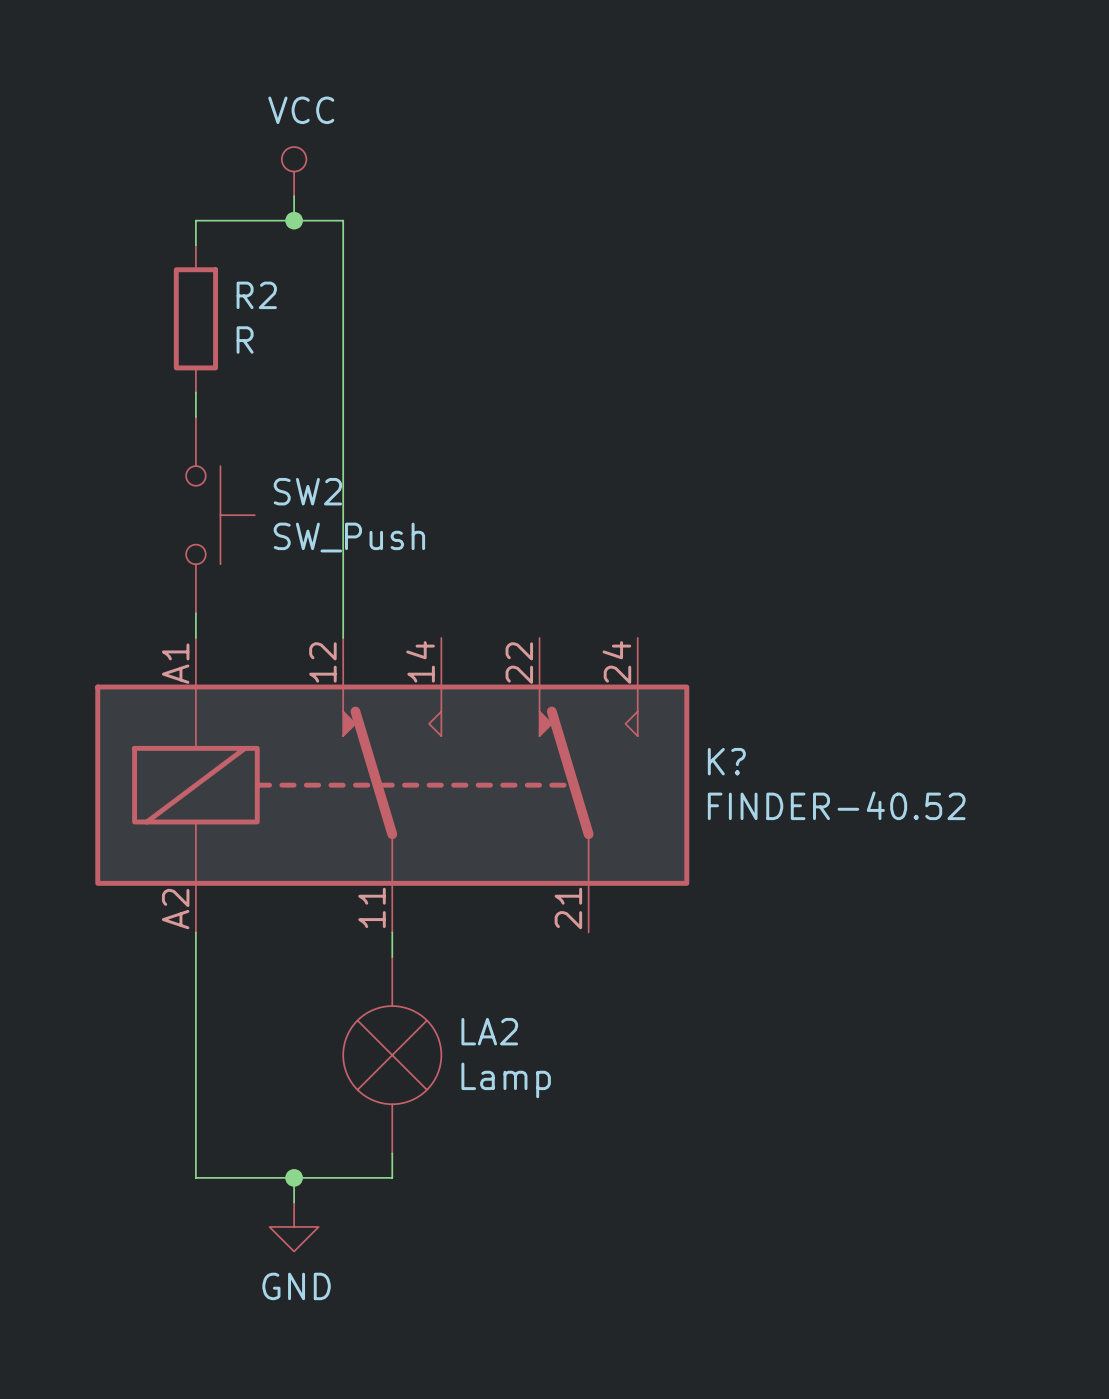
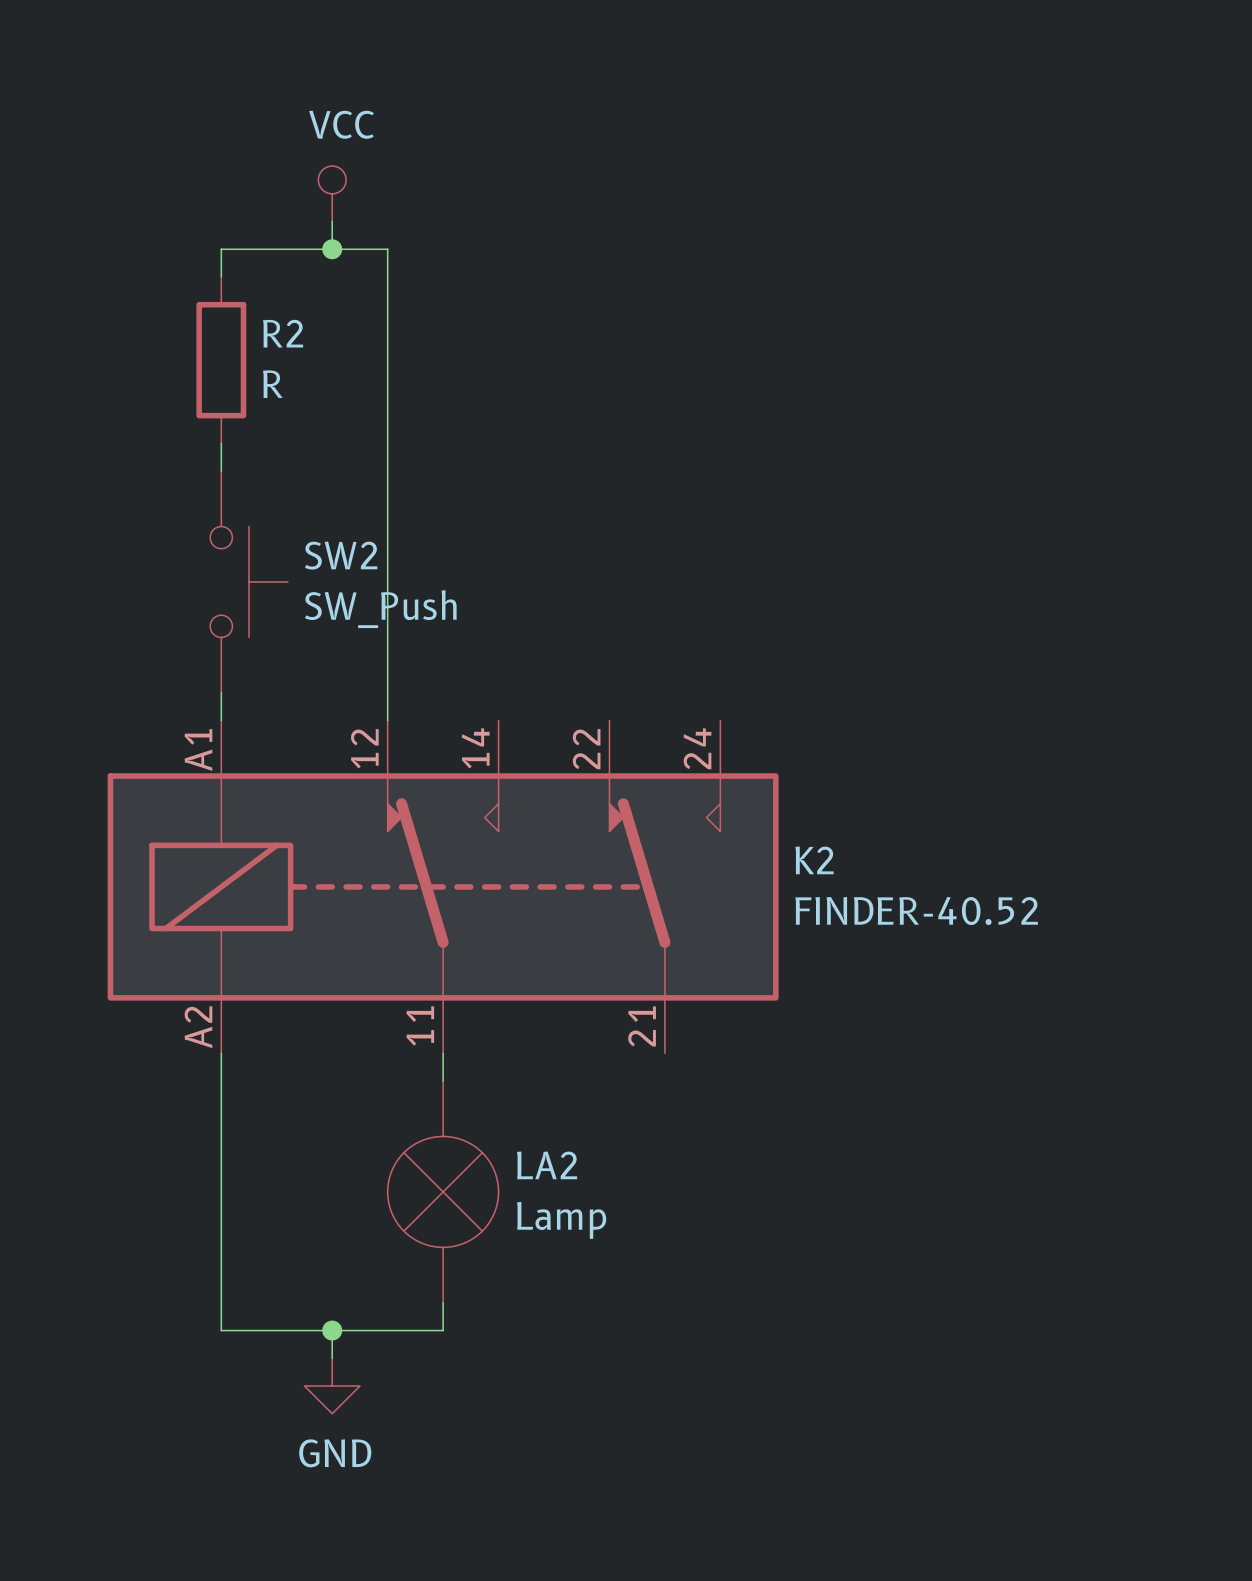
K? name: K? (726, 761) -> K2 (814, 860)

